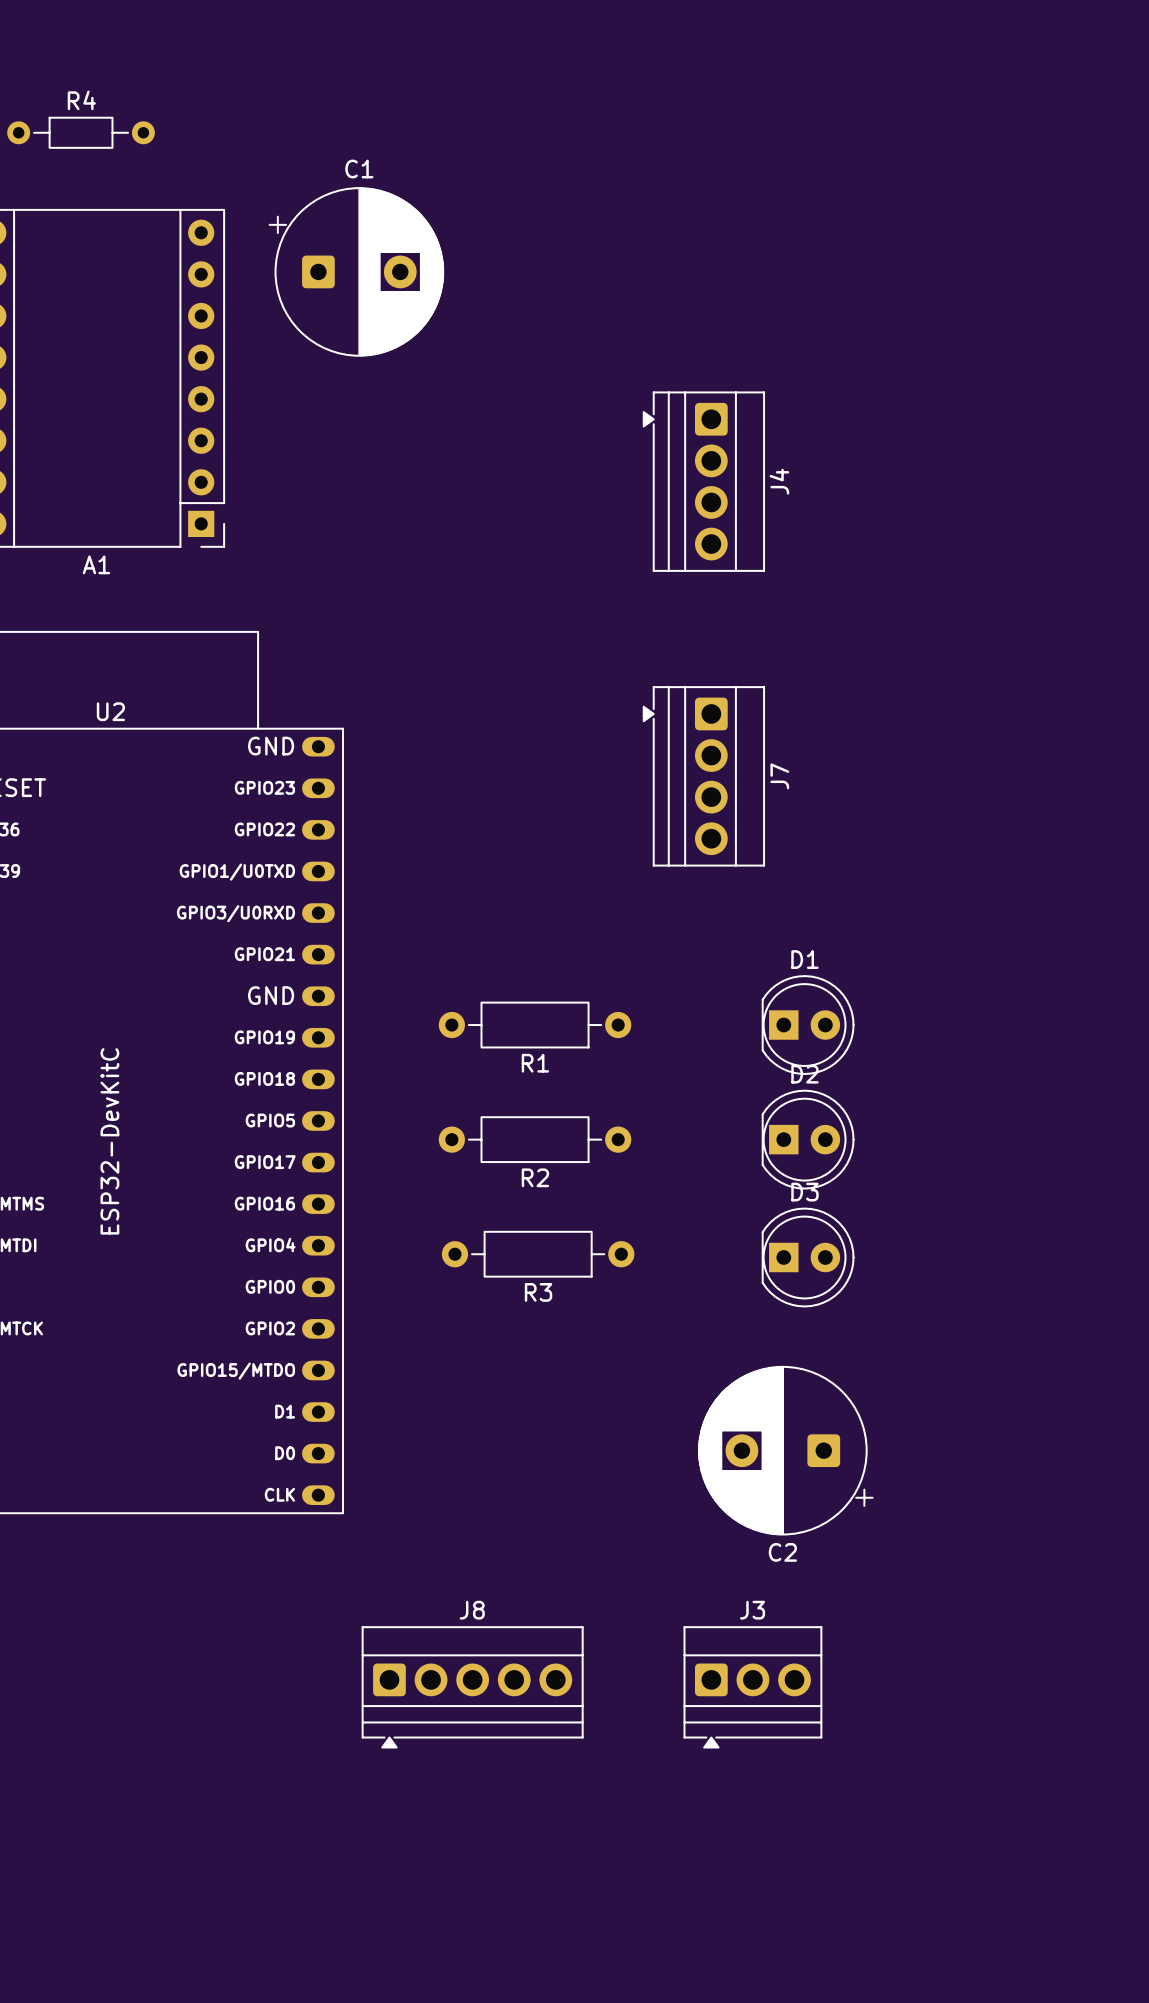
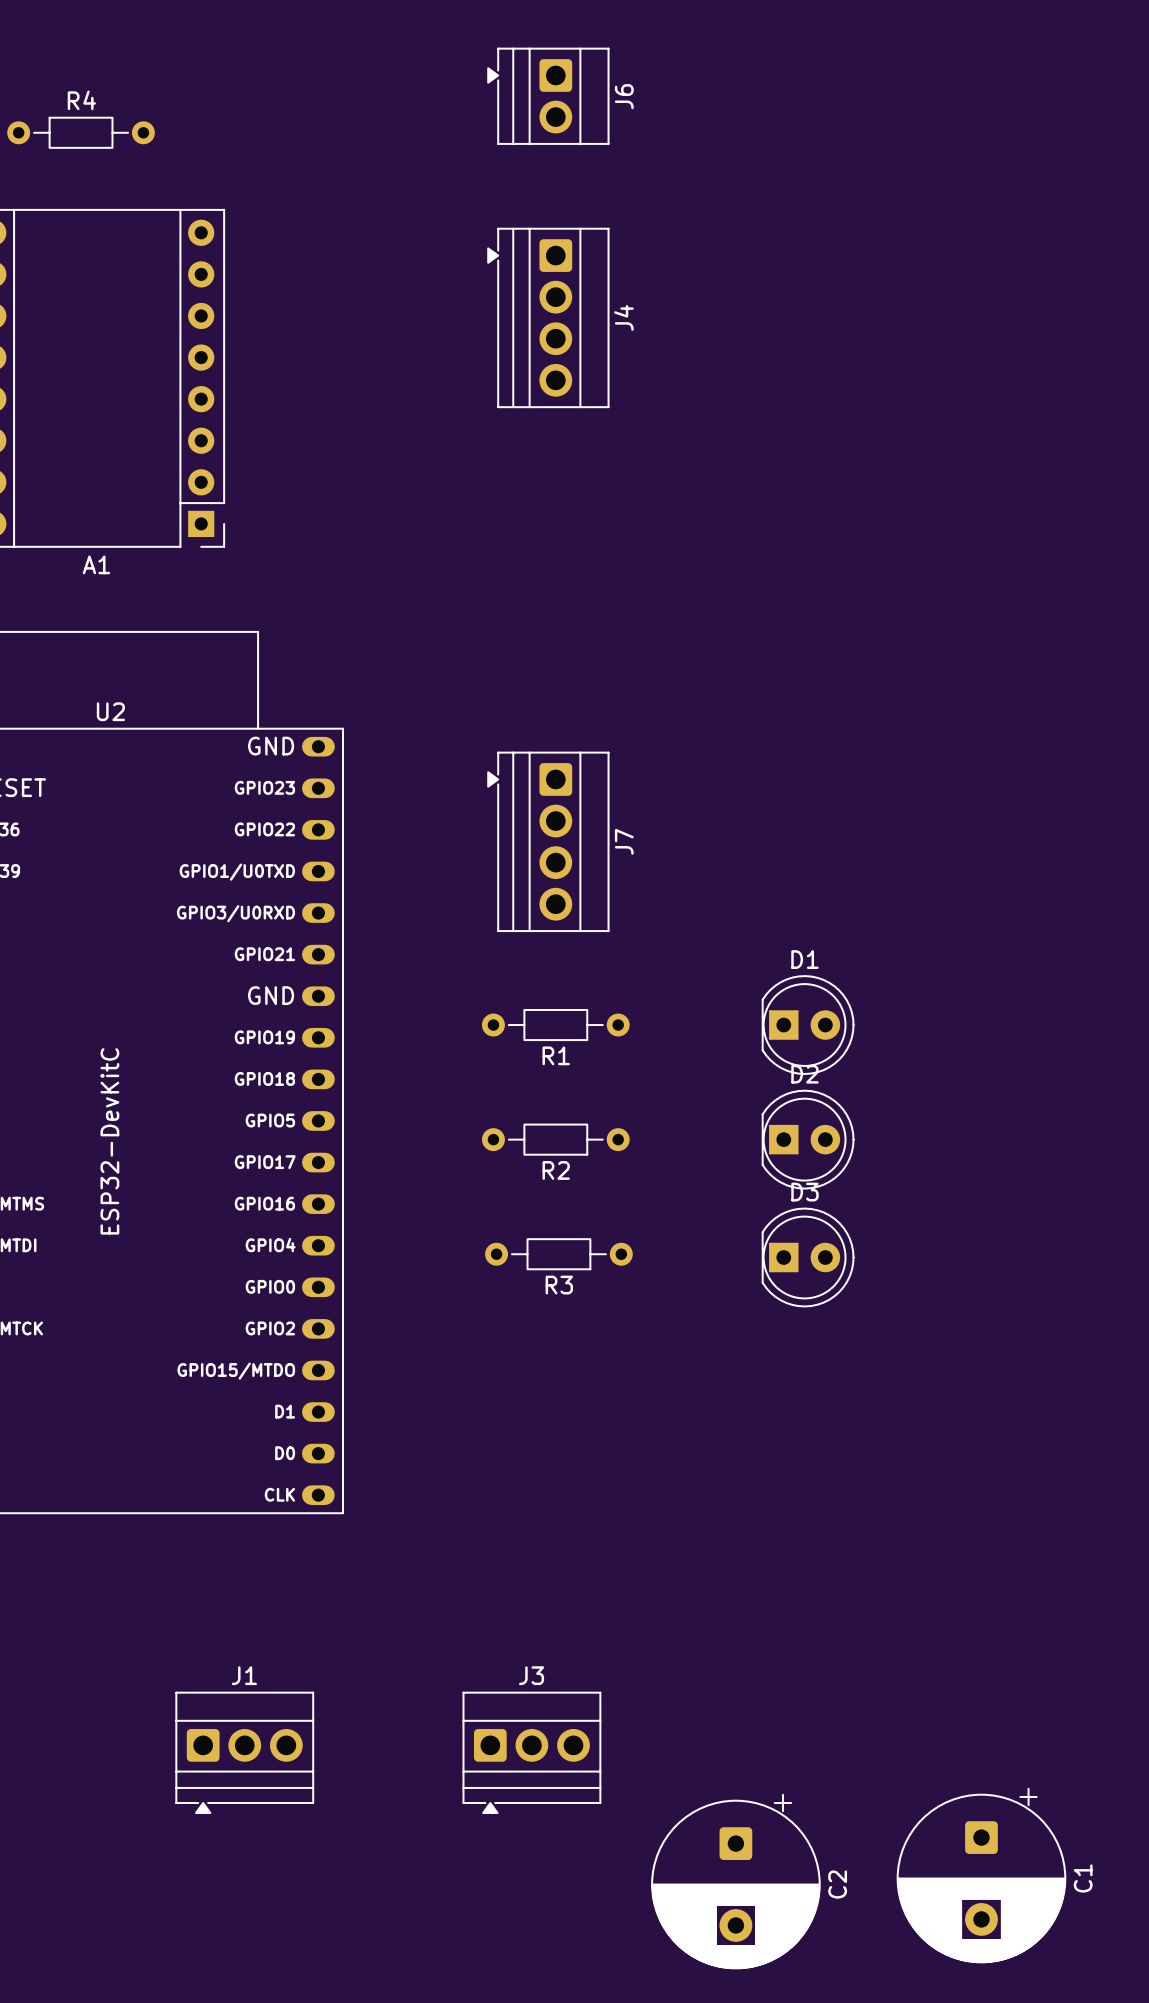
J6: none -> (548, 96)
C1 rotation: 0° (356, 271) -> 90° clockwise (981, 1875)
C1 position: (356, 271) -> (981, 1875)
J4 position: (703, 481) -> (548, 317)
J7 position: (703, 776) -> (548, 841)
R1 footprint: [438, 1001, 632, 1049] -> [481, 1008, 630, 1042]
R2 footprint: [438, 1116, 632, 1164] -> [481, 1123, 630, 1156]
R3 footprint: [441, 1230, 635, 1278] -> [485, 1238, 633, 1271]
C2 rotation: 0° (785, 1450) -> 90° counterclockwise (735, 1881)
C2 position: (785, 1450) -> (735, 1881)
J8: (472, 1687) -> none
J3 position: (752, 1687) -> (531, 1752)
J1: none -> (244, 1752)

